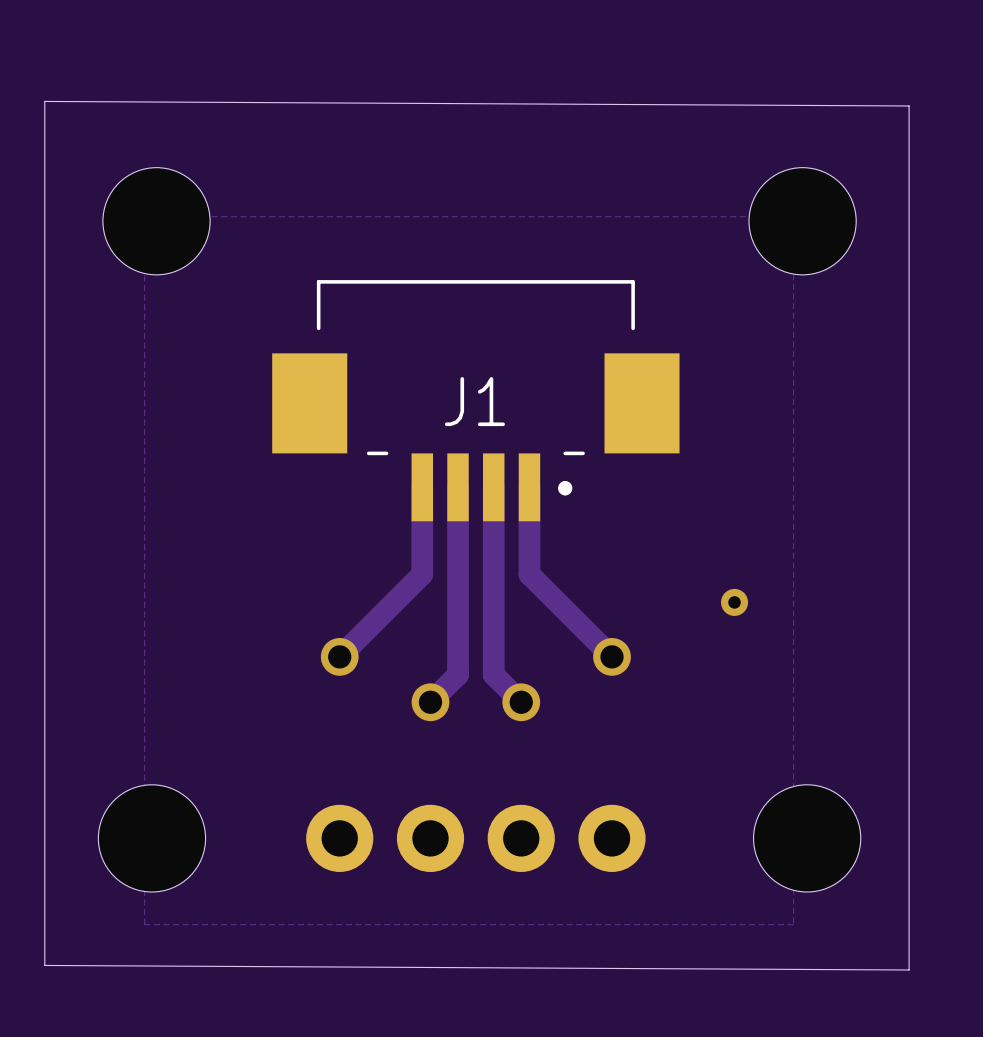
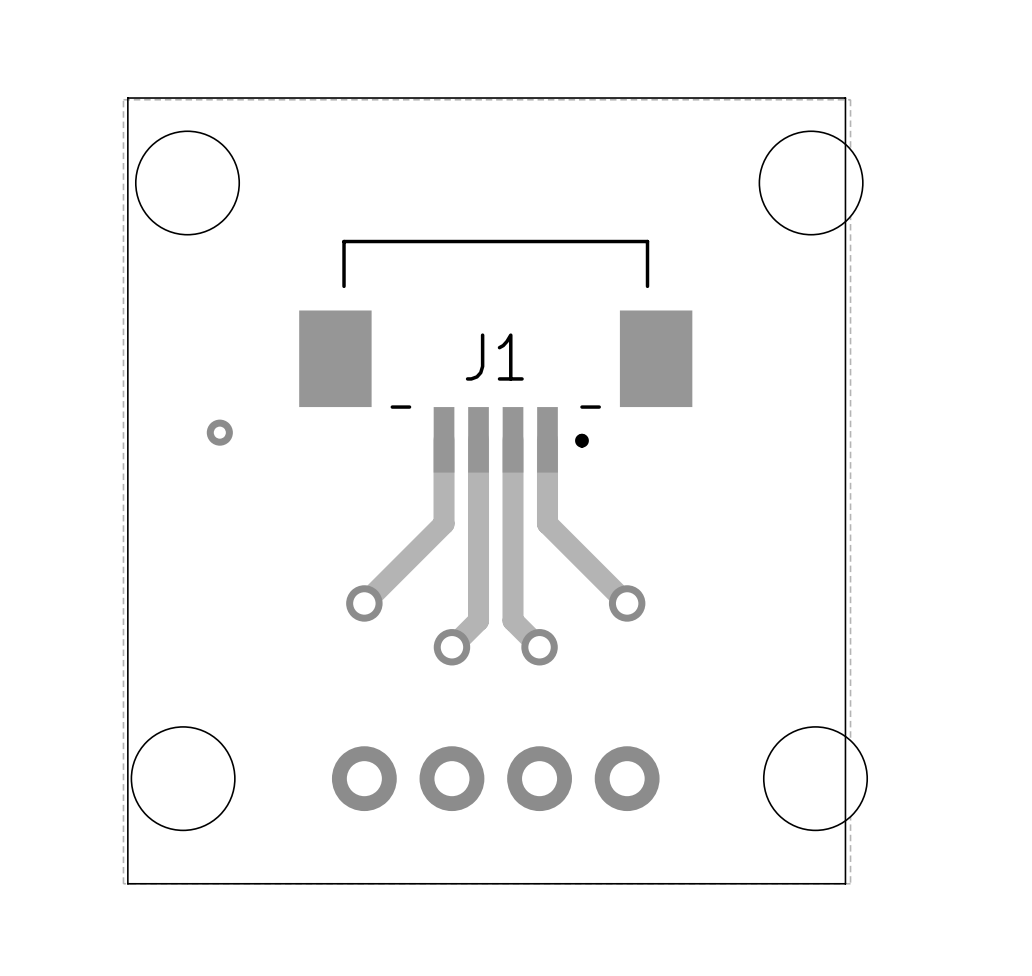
board edge: (44, 101) (909, 105) (909, 970) (44, 965) (44, 101) -> (127, 98) (127, 883) (845, 883) (845, 98) (127, 98)
zone outline: (144, 216) (793, 216) (793, 924) (144, 924) (144, 216) -> (123, 99) (123, 883) (850, 883) (850, 99) (123, 99)
via: none -> (219, 432)
via: (734, 602) -> none

